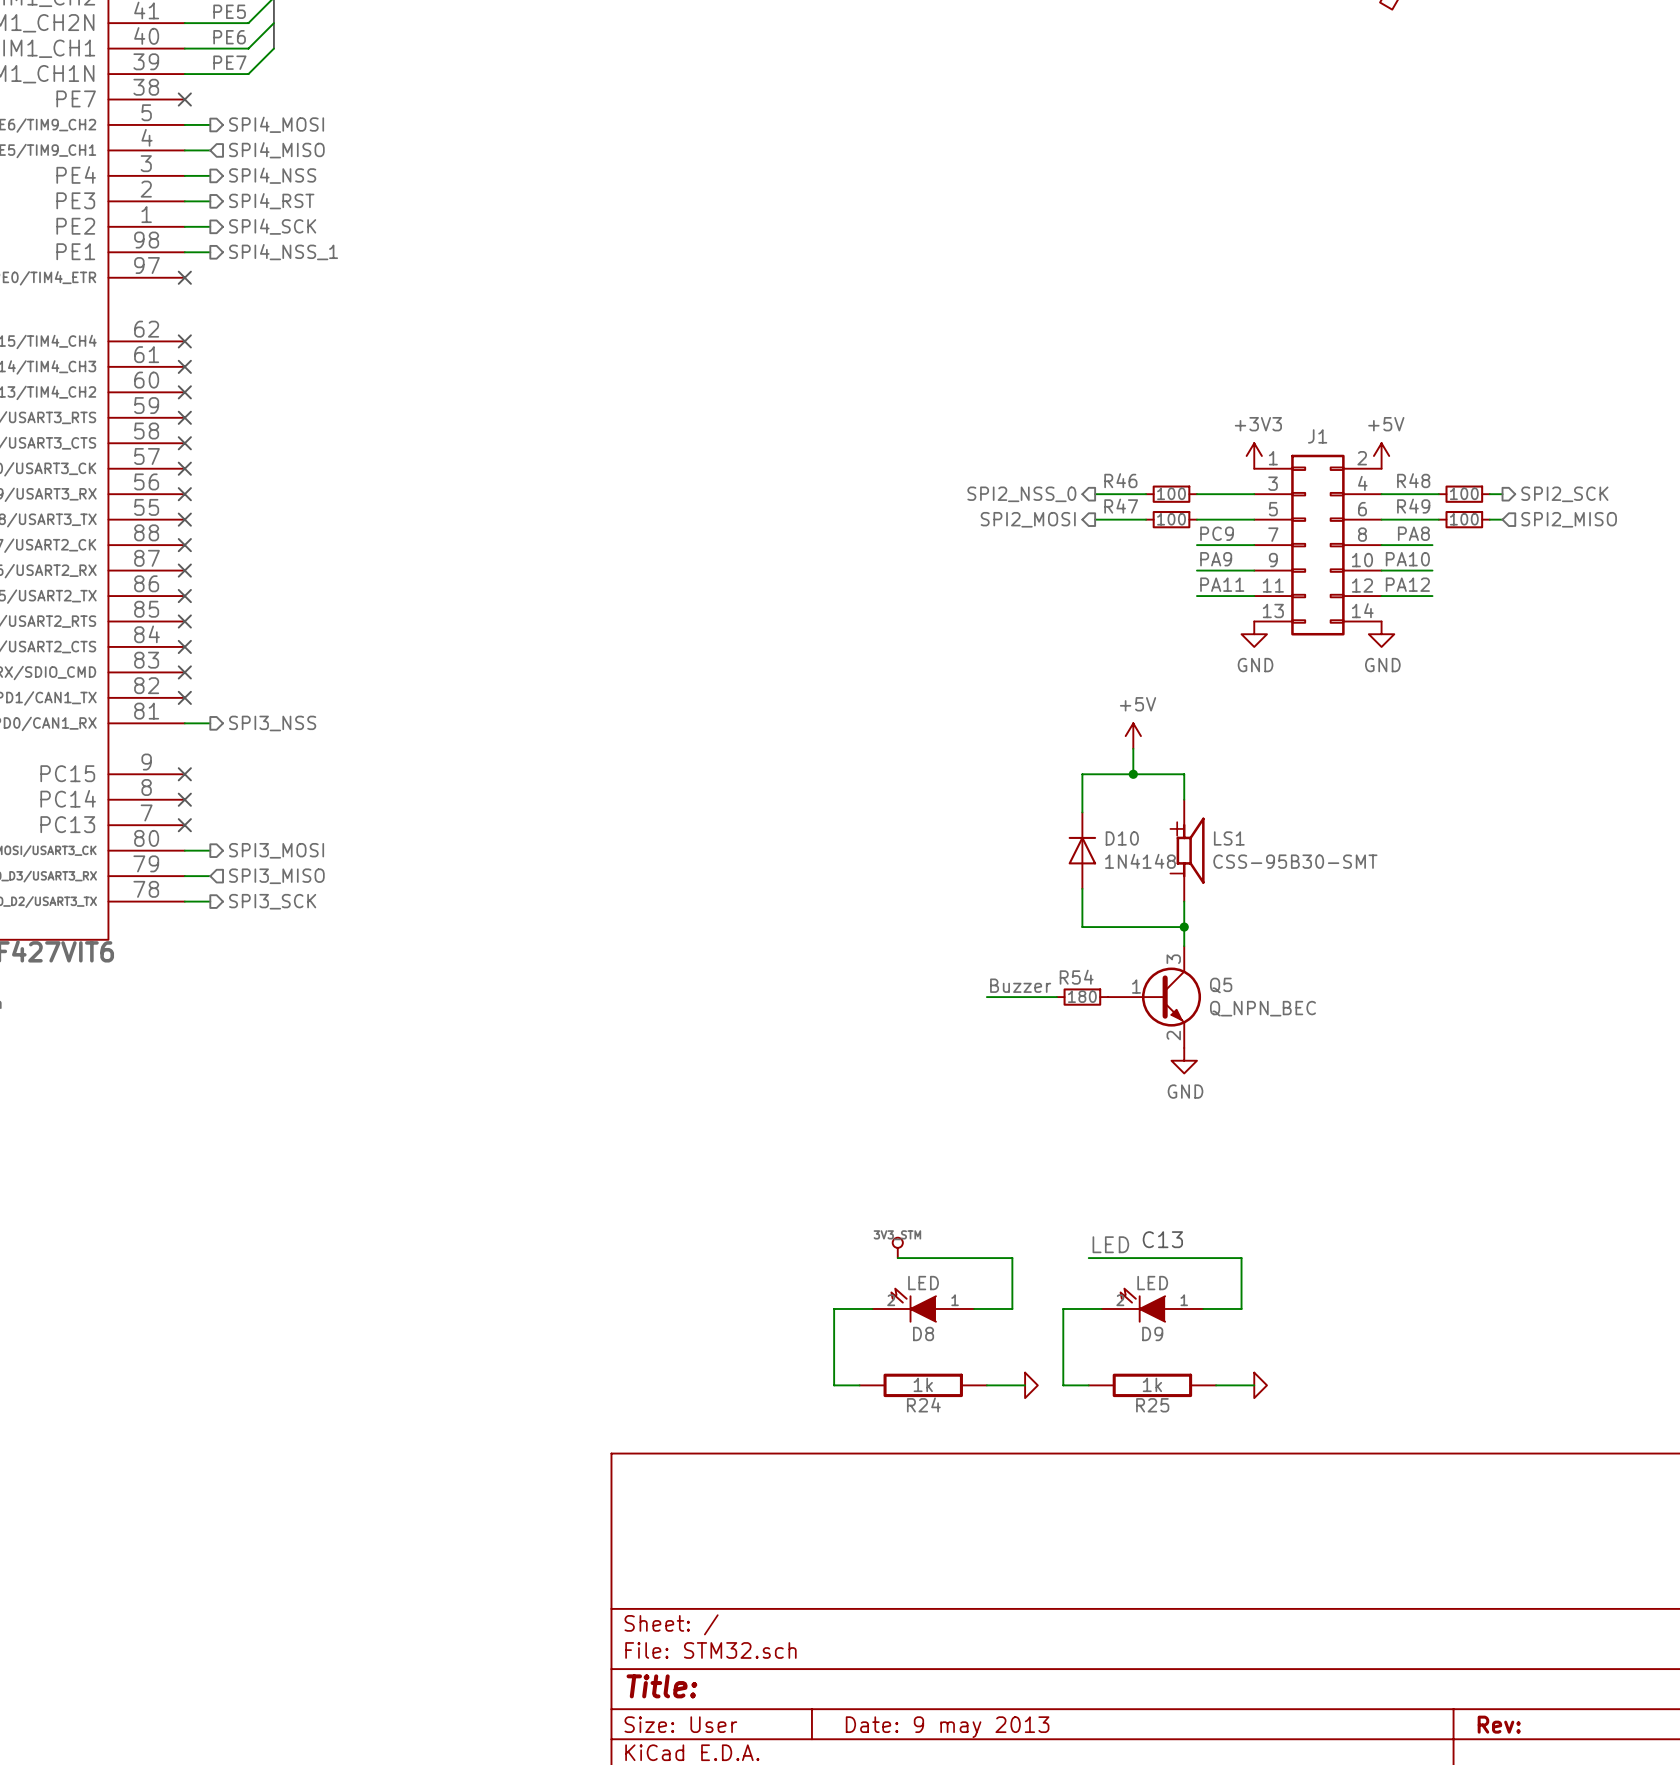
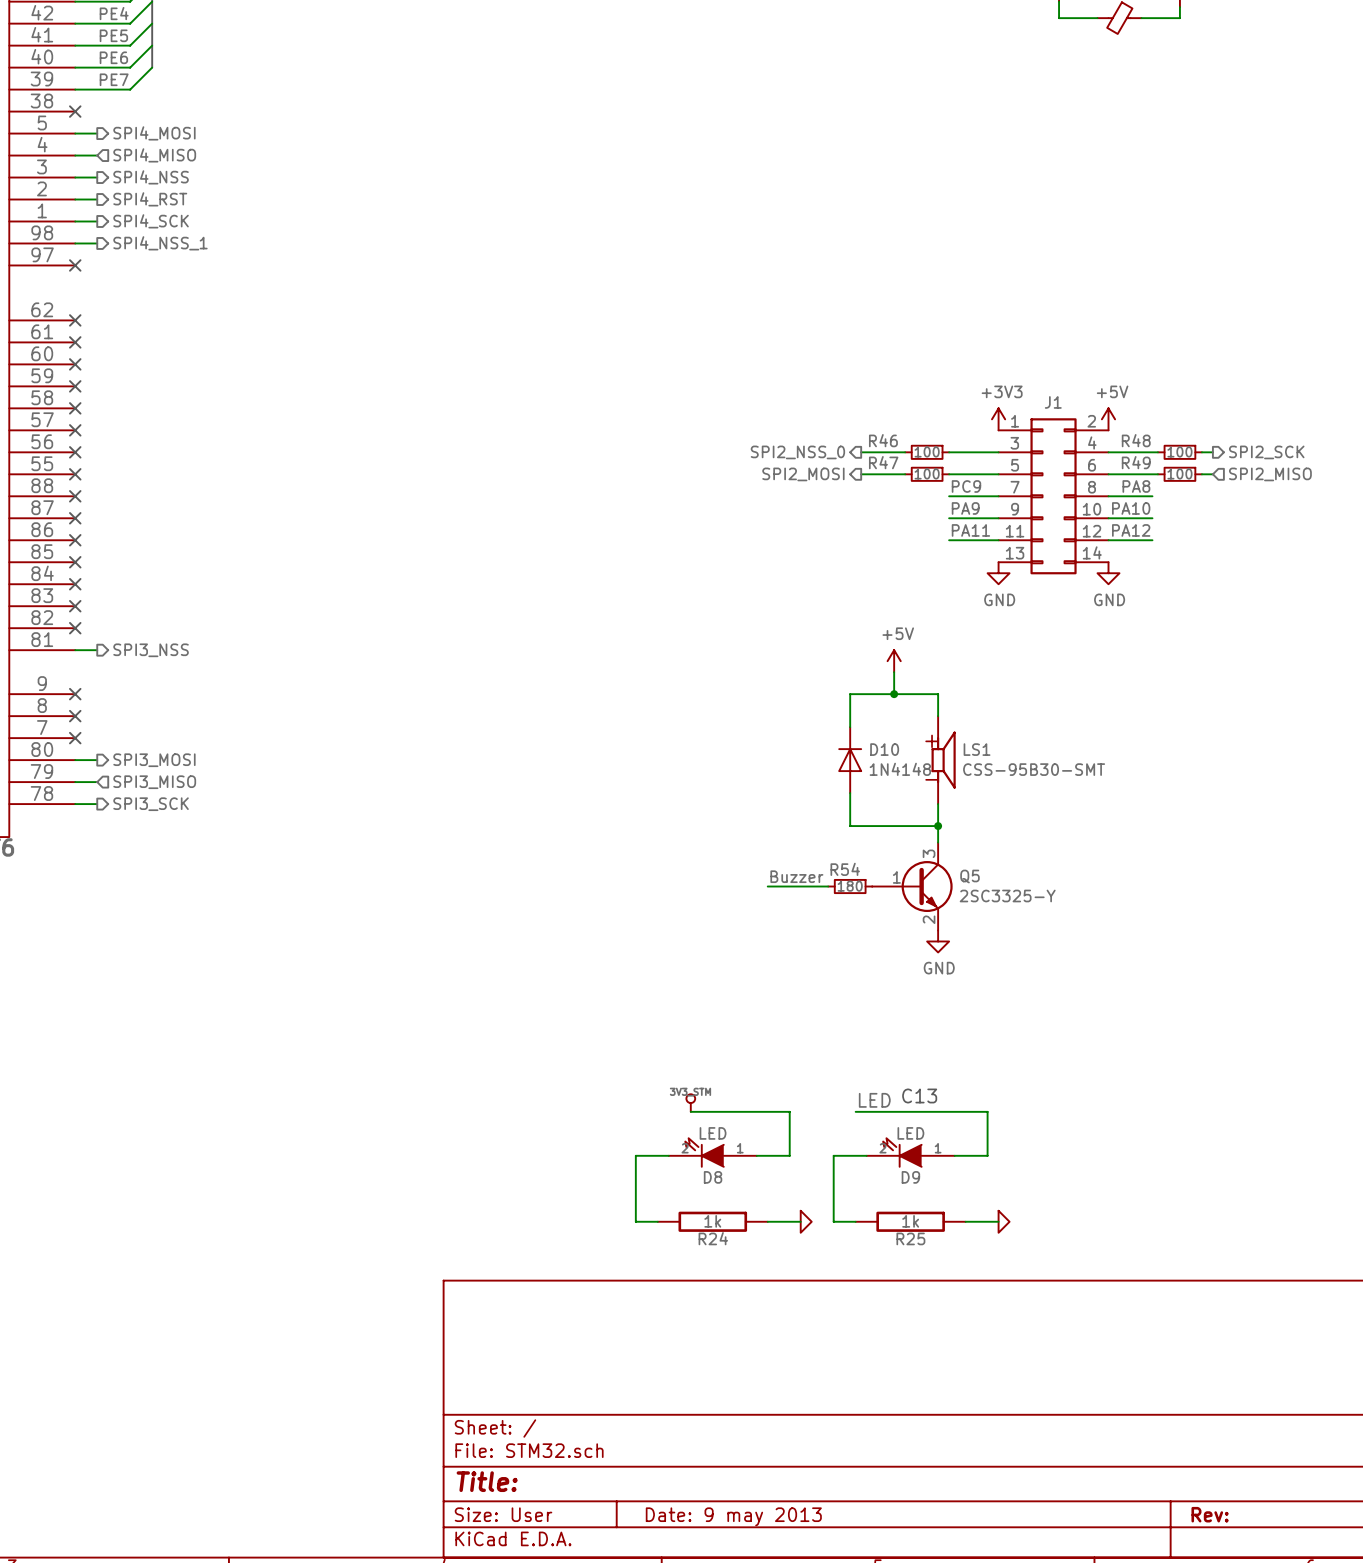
Q5 value: Q_NPN_BEC (1262, 1008) -> 2SC3325-Y (1007, 895)

